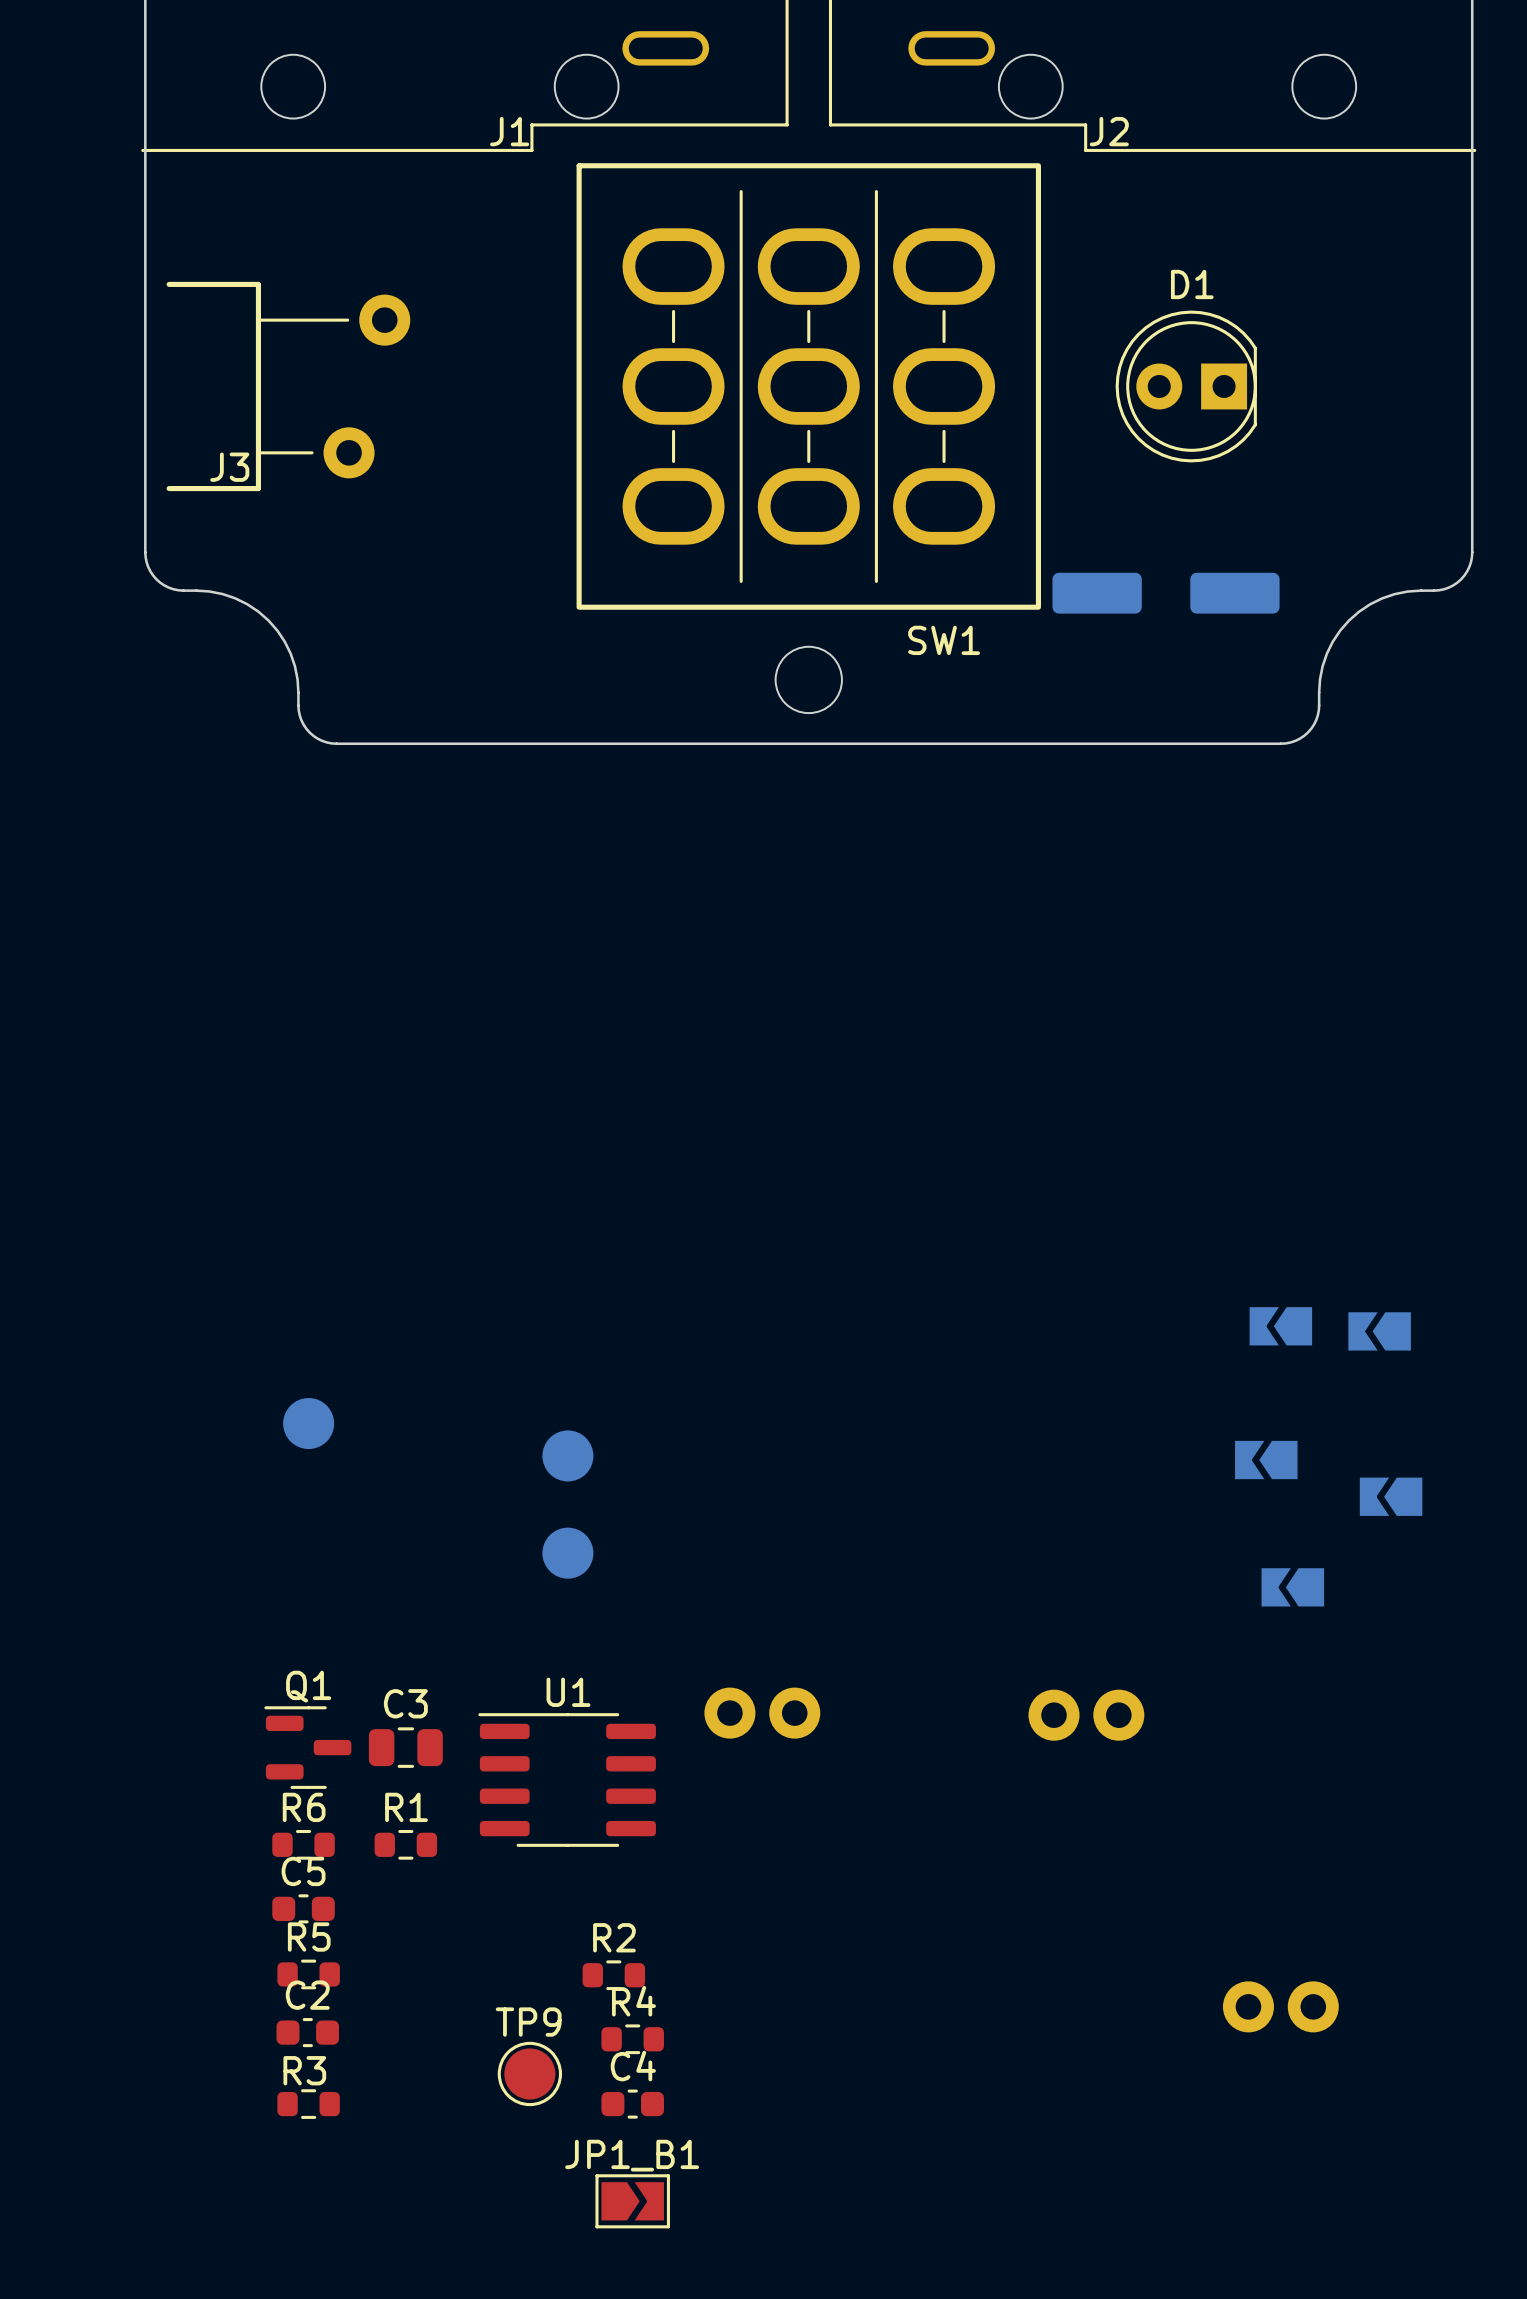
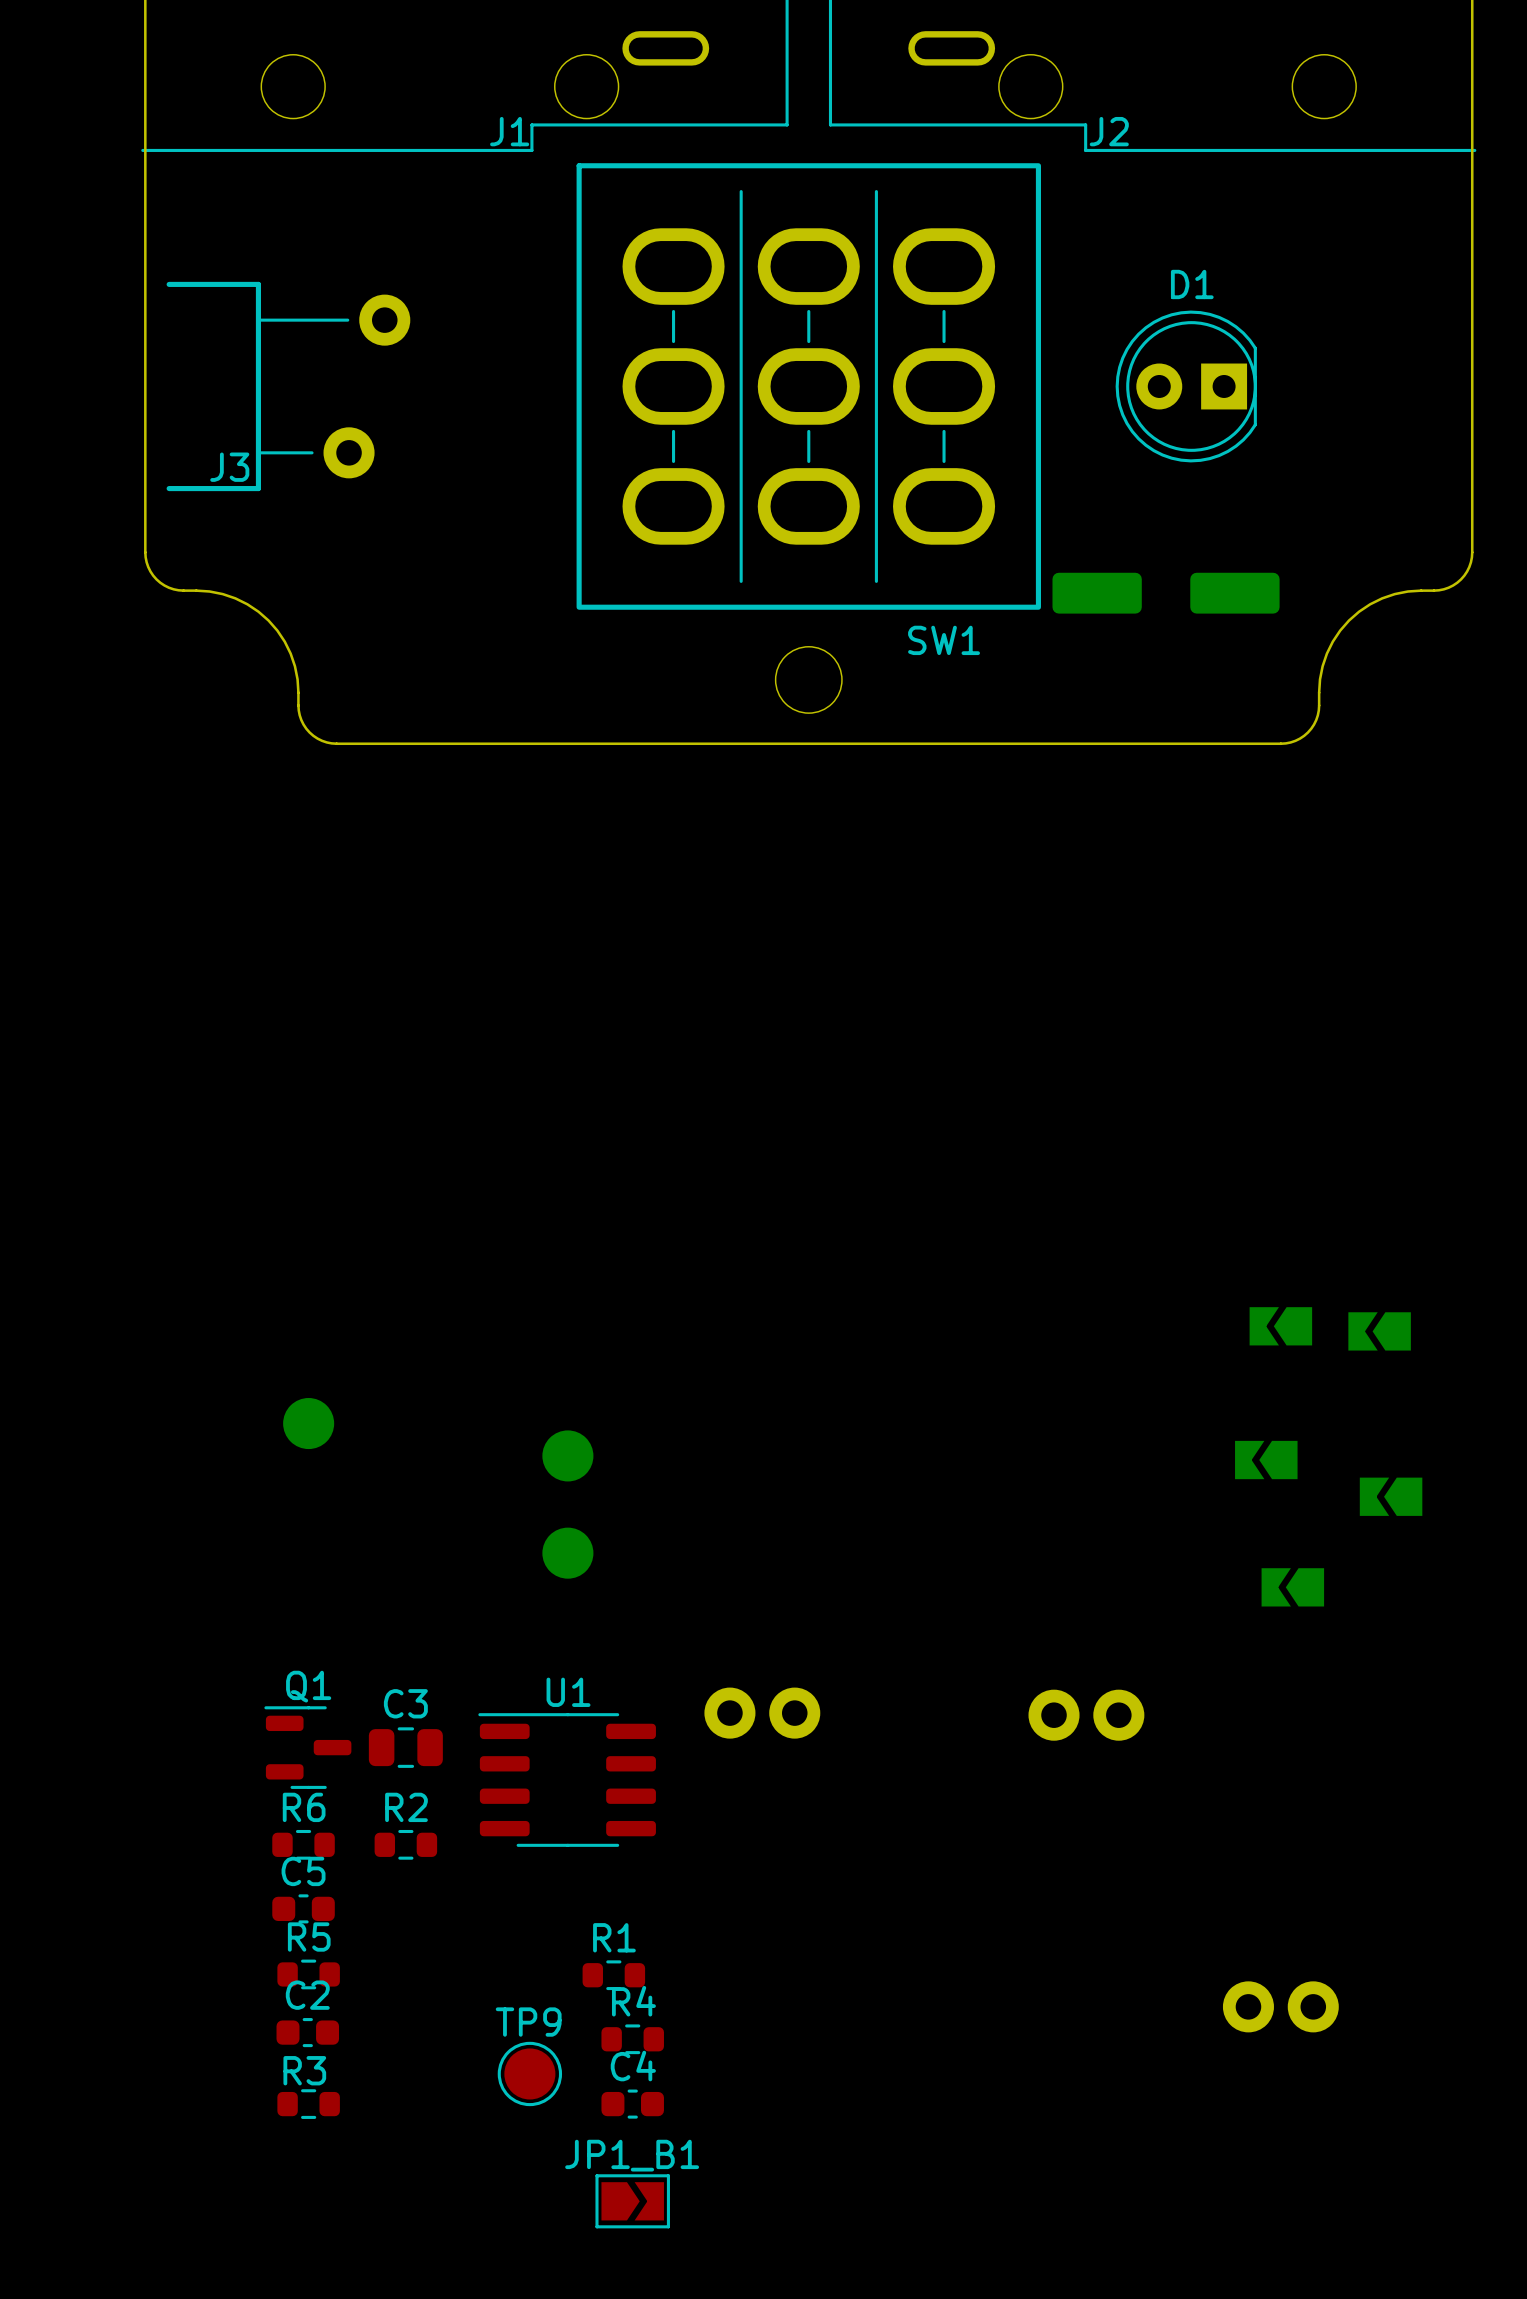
R1 name: R1 (406, 1807) -> R2 (406, 1807)
R2 name: R2 (614, 1937) -> R1 (614, 1937)

